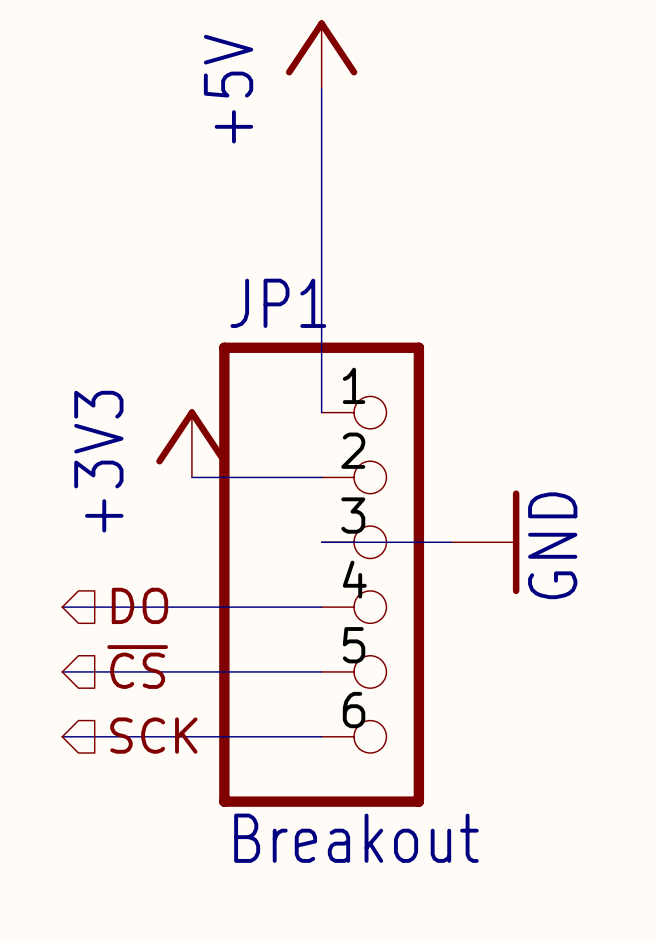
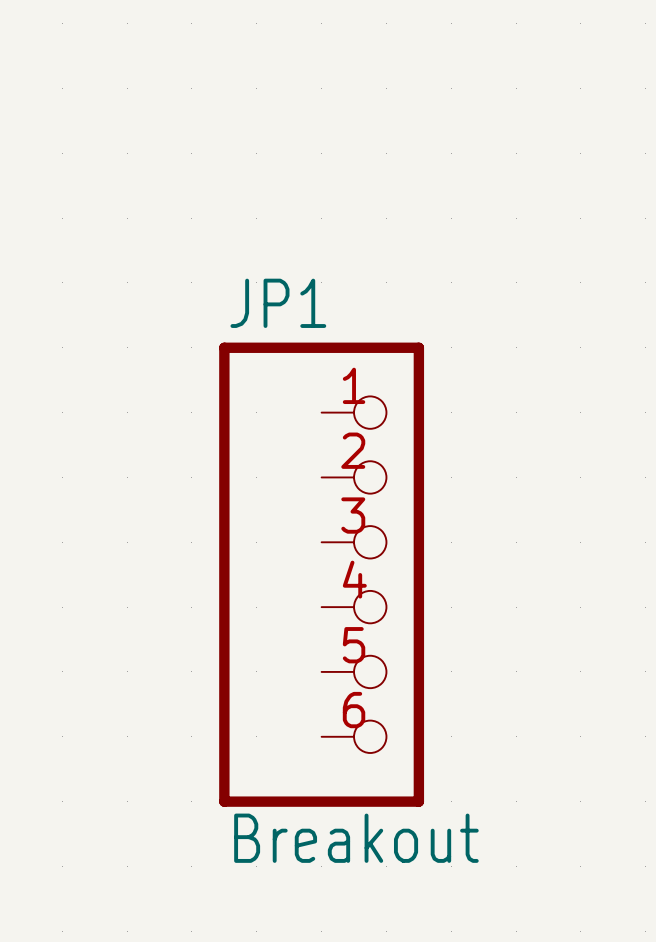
power symbol: +5V (321, 54) -> none
wire: (321, 88) (321, 412) -> none
power symbol: +3V3 (191, 443) -> none
wire: (191, 477) (321, 477) -> none
wire: (321, 542) (451, 542) -> none
power symbol: GND (485, 542) -> none
hierarchical label: DO (139, 605) -> none
wire: (62, 607) (321, 607) -> none
hierarchical label: ~{CS} (137, 667) -> none
wire: (62, 671) (321, 671) -> none
hierarchical label: SCK (153, 735) -> none
wire: (62, 736) (321, 736) -> none

